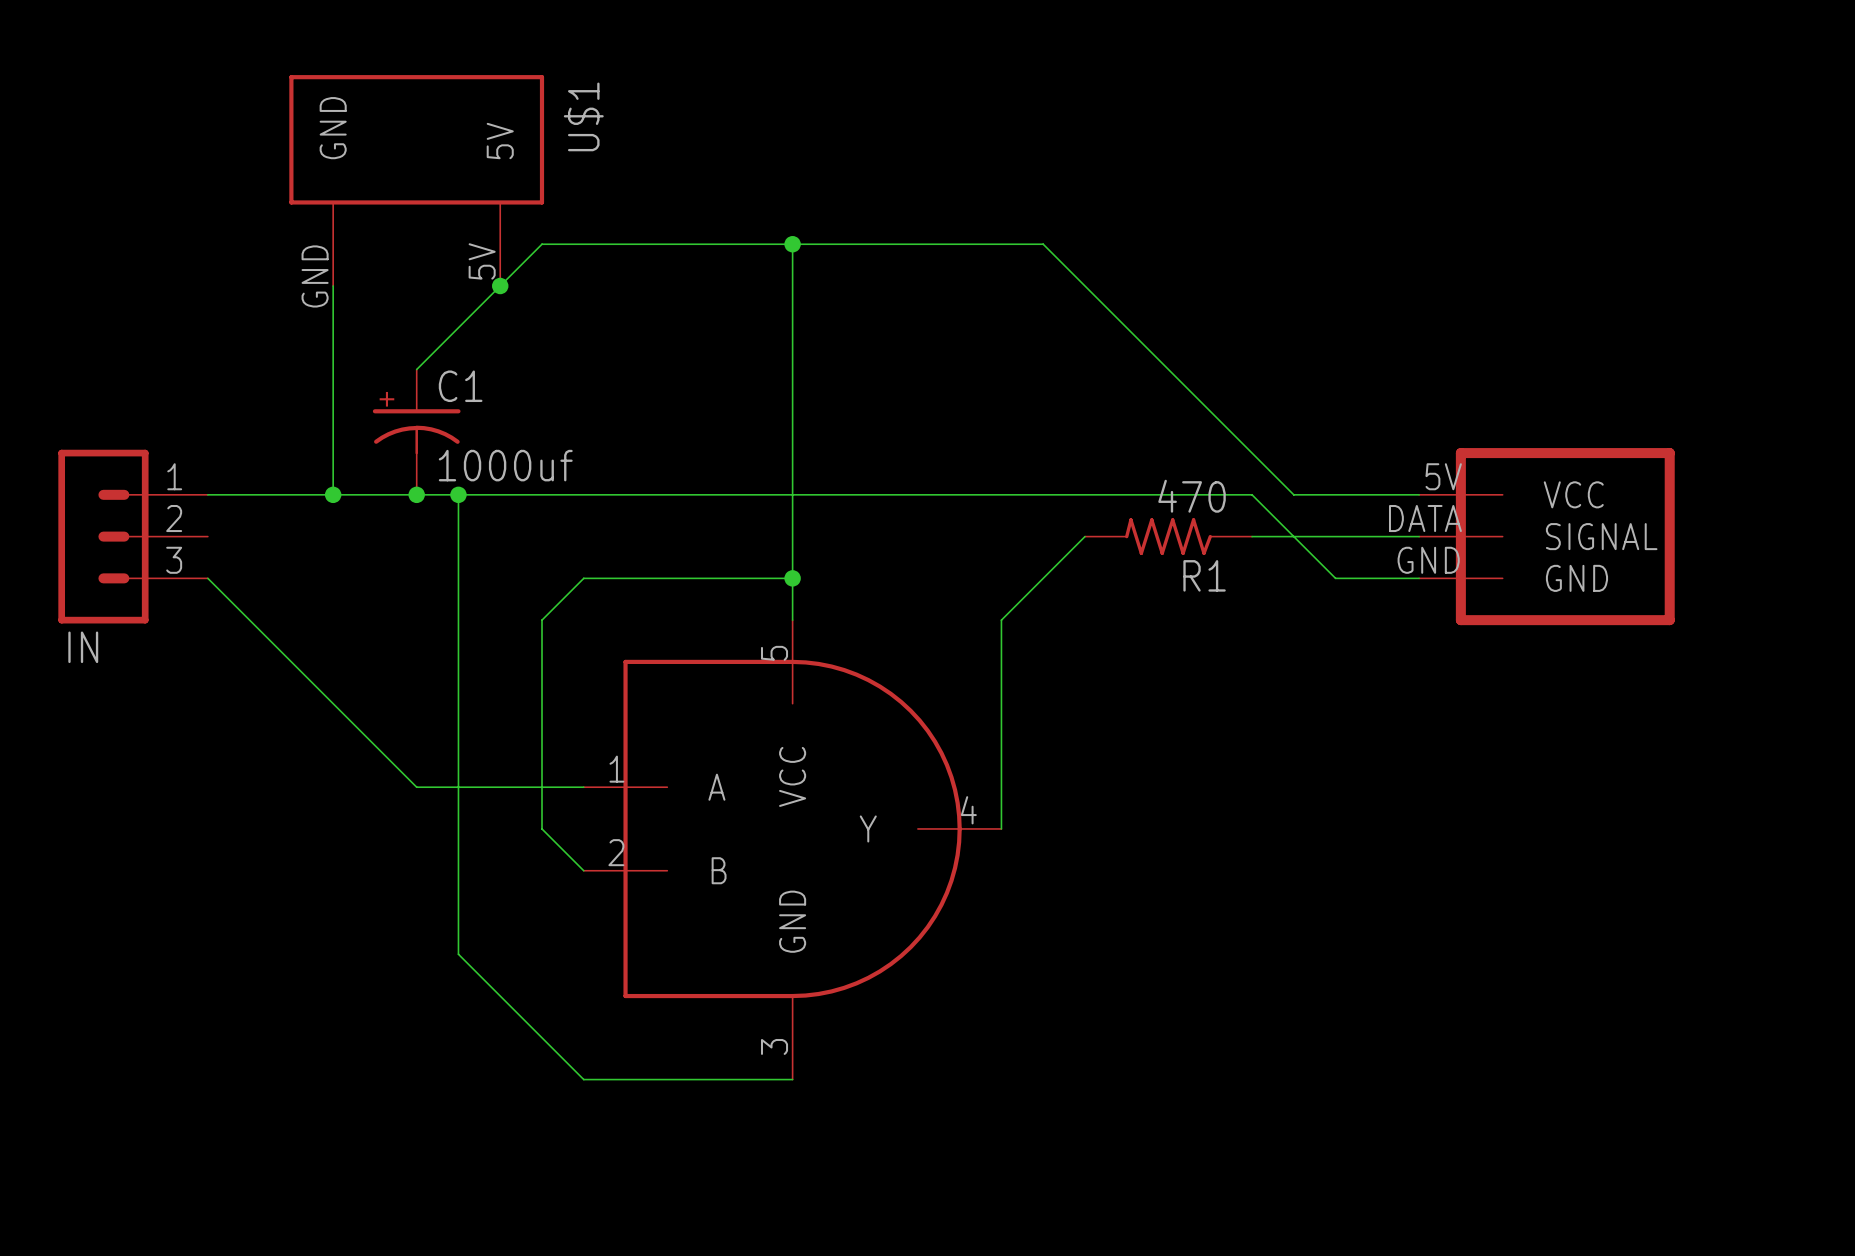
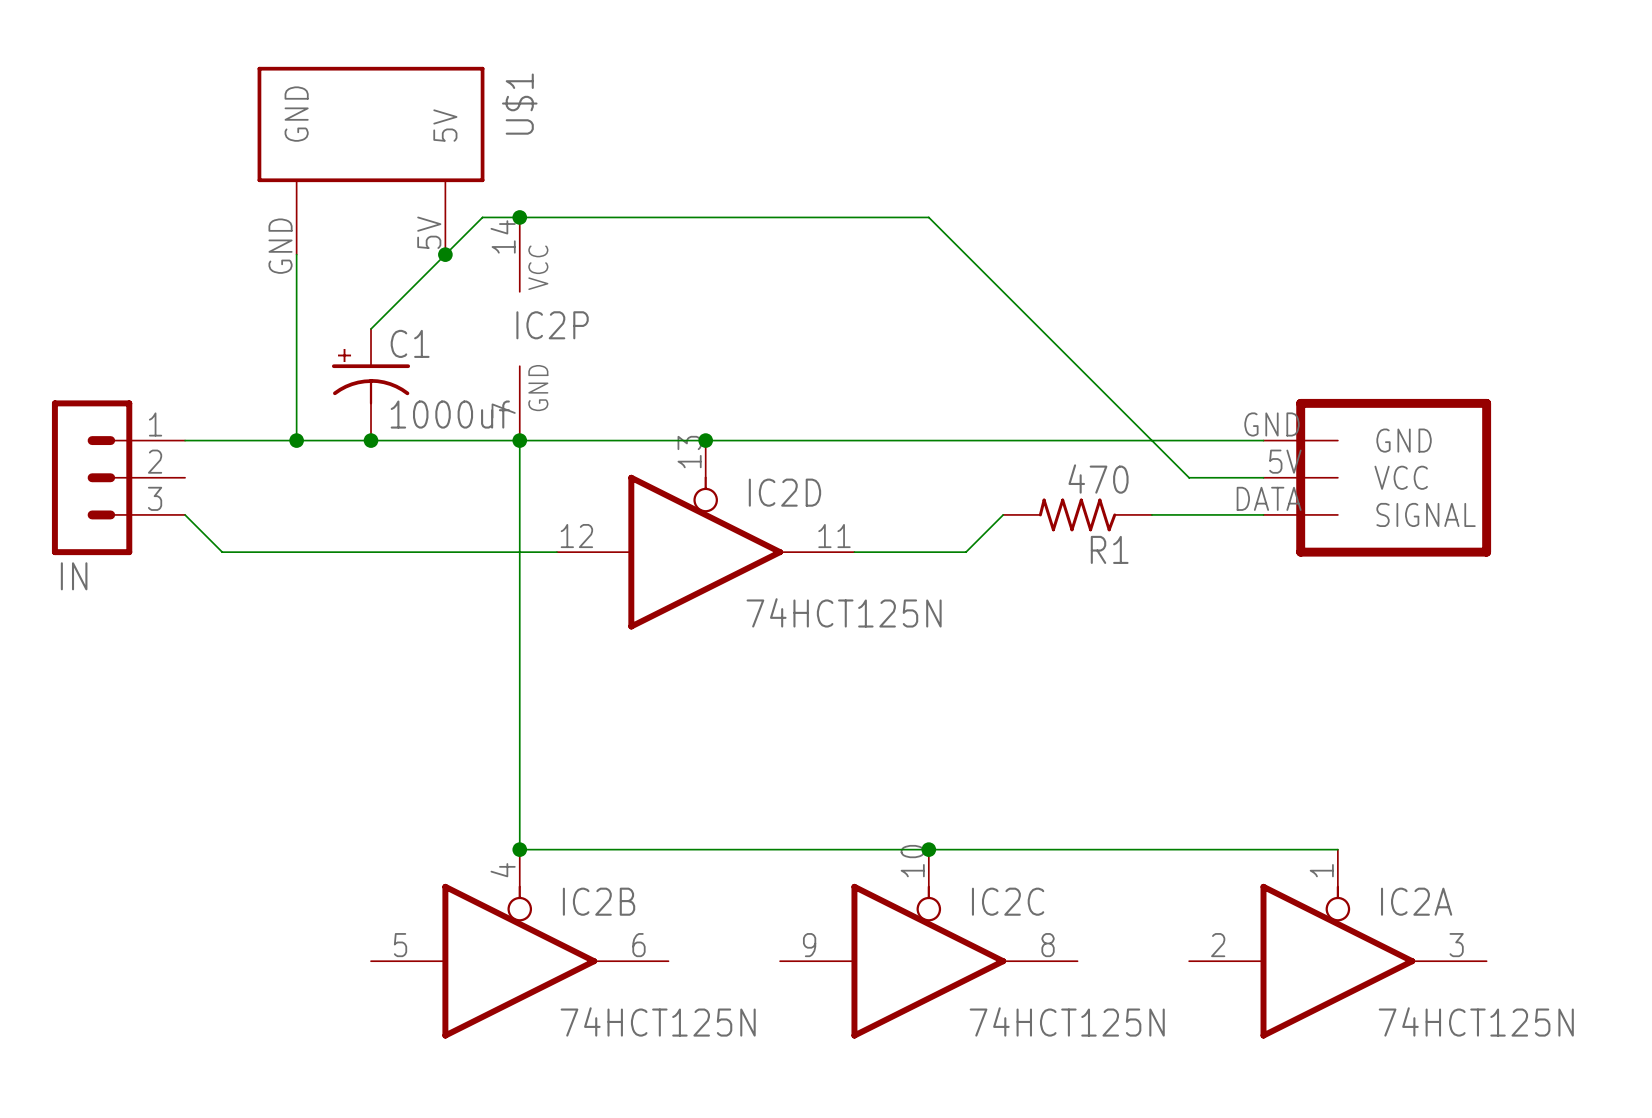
junction: none -> (519, 217)
wire: (792, 244) (792, 620) -> none
junction: (792, 244) -> none
IC2P: none -> (519, 329)
part pin number: 5V (1443, 476) -> GND (1271, 424)
wire: (458, 494) (458, 954) (583, 1079) (792, 1079) -> none
junction: (458, 494) -> none
wire: none -> (519, 440) (519, 849) (1337, 849)
junction: none -> (519, 440)
wire: (1252, 494) (1335, 578) -> (1114, 440) (1151, 440) (1189, 477)
part pin name: VCC (1573, 494) -> GND (1404, 440)
part pin number: DATA (1425, 518) -> 5V (1285, 461)
wire: (1084, 536) (1001, 620) (1001, 828) -> none
R1 position: (1168, 536) -> (1077, 514)
wire: (1252, 536) (1335, 536) -> none
part pin name: SIGNAL (1601, 536) -> VCC (1401, 477)
part pin number: GND (1428, 560) -> DATA (1269, 498)
wire: (792, 578) (583, 578) (542, 620) (542, 828) (583, 870) -> none
junction position: (792, 578) -> (705, 440)
wire: none -> (1003, 514) (966, 552) (854, 552)
wire: none -> (1151, 514) (1189, 514)
part pin name: GND (1576, 578) -> SIGNAL (1426, 514)
IC2D: none -> 74HCT125N (705, 535)
wire: (249, 620) (416, 787) (583, 787) -> (222, 552) (556, 552)
part: (792, 849) -> none
junction: none -> (519, 849)
junction: none -> (928, 849)
IC2B: none -> 74HCT125N (519, 944)
IC2C: none -> 74HCT125N (928, 944)
IC2A: none -> 74HCT125N (1337, 944)

